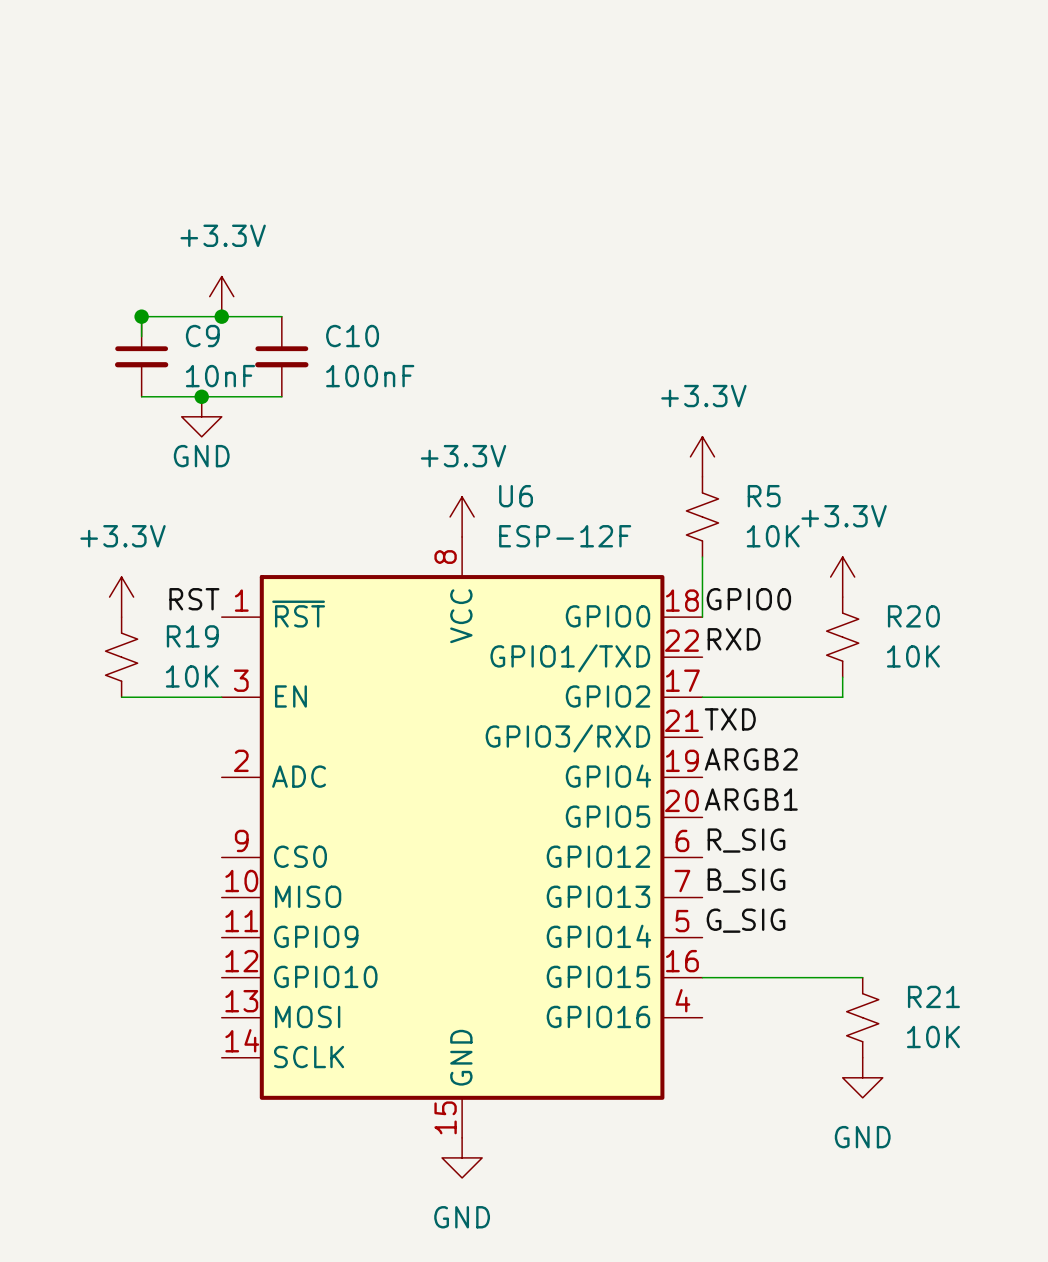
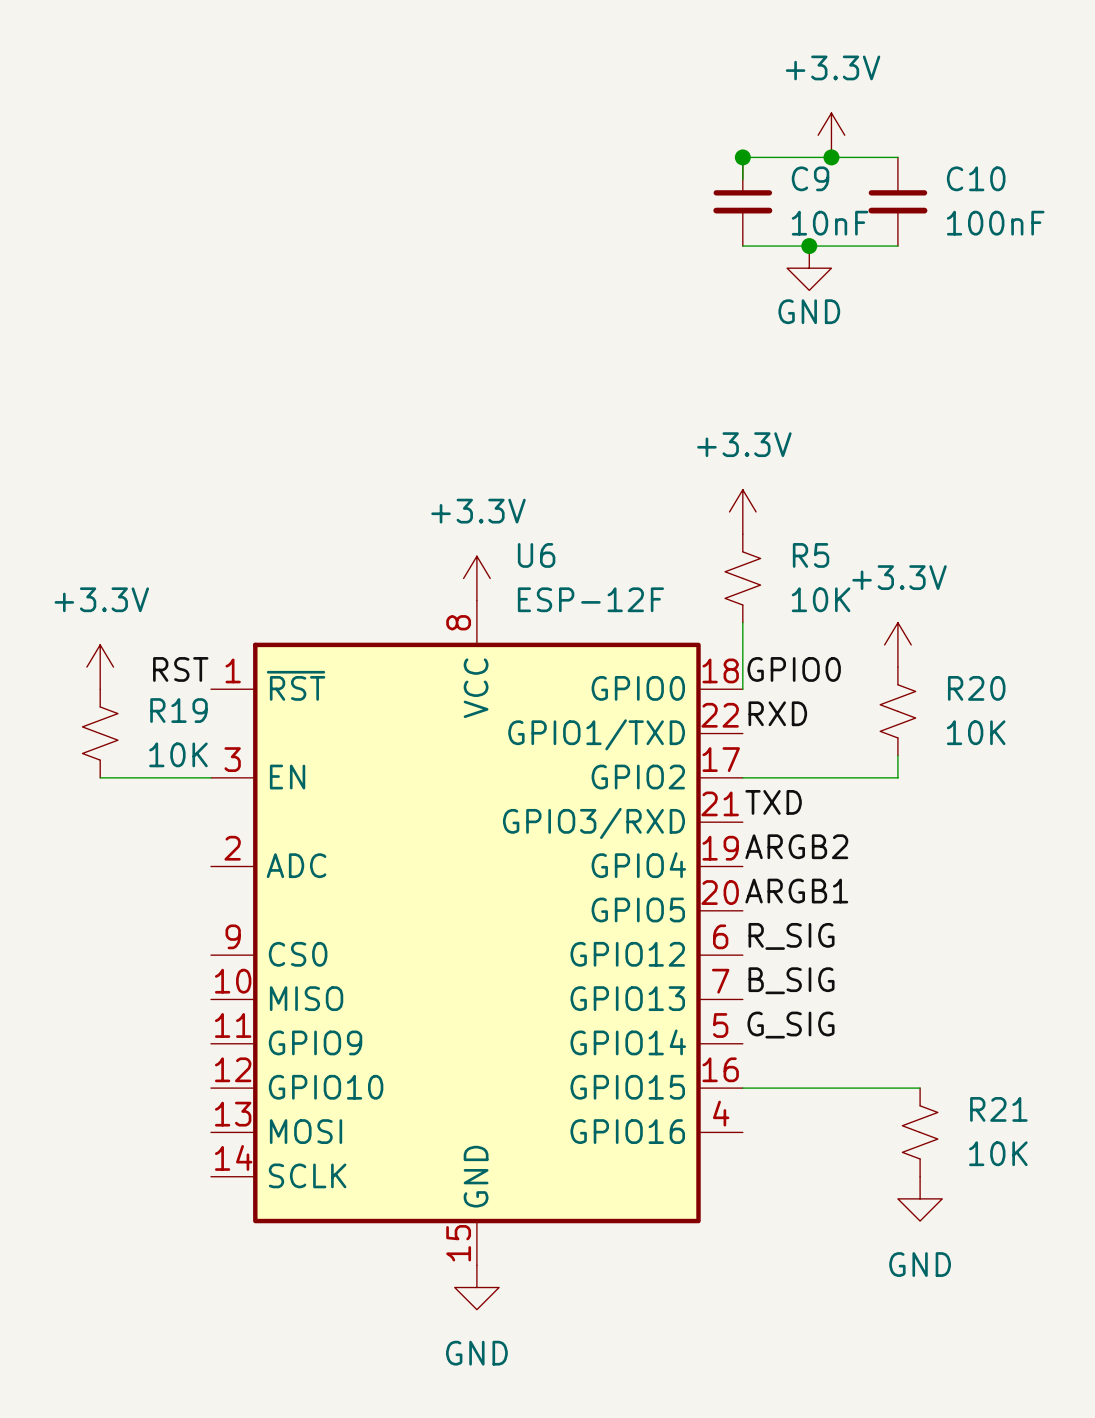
power symbol: none -> +3.3V (831, 135)
junction: none -> (742, 157)
junction: none -> (831, 157)
wire: none -> (897, 157) (742, 157) (742, 179)
wire: none -> (742, 246) (897, 246)
junction: none -> (809, 246)
power symbol: none -> GND (809, 268)
power symbol: +3.3V (221, 296) -> none
junction: (141, 316) -> none
junction: (221, 316) -> none
wire: (281, 316) (141, 316) (141, 336) -> none
C9 position: (141, 356) -> (742, 201)
C10 position: (281, 356) -> (897, 201)
wire: (141, 396) (281, 396) -> none
junction: (201, 396) -> none
power symbol: GND (201, 416) -> none

